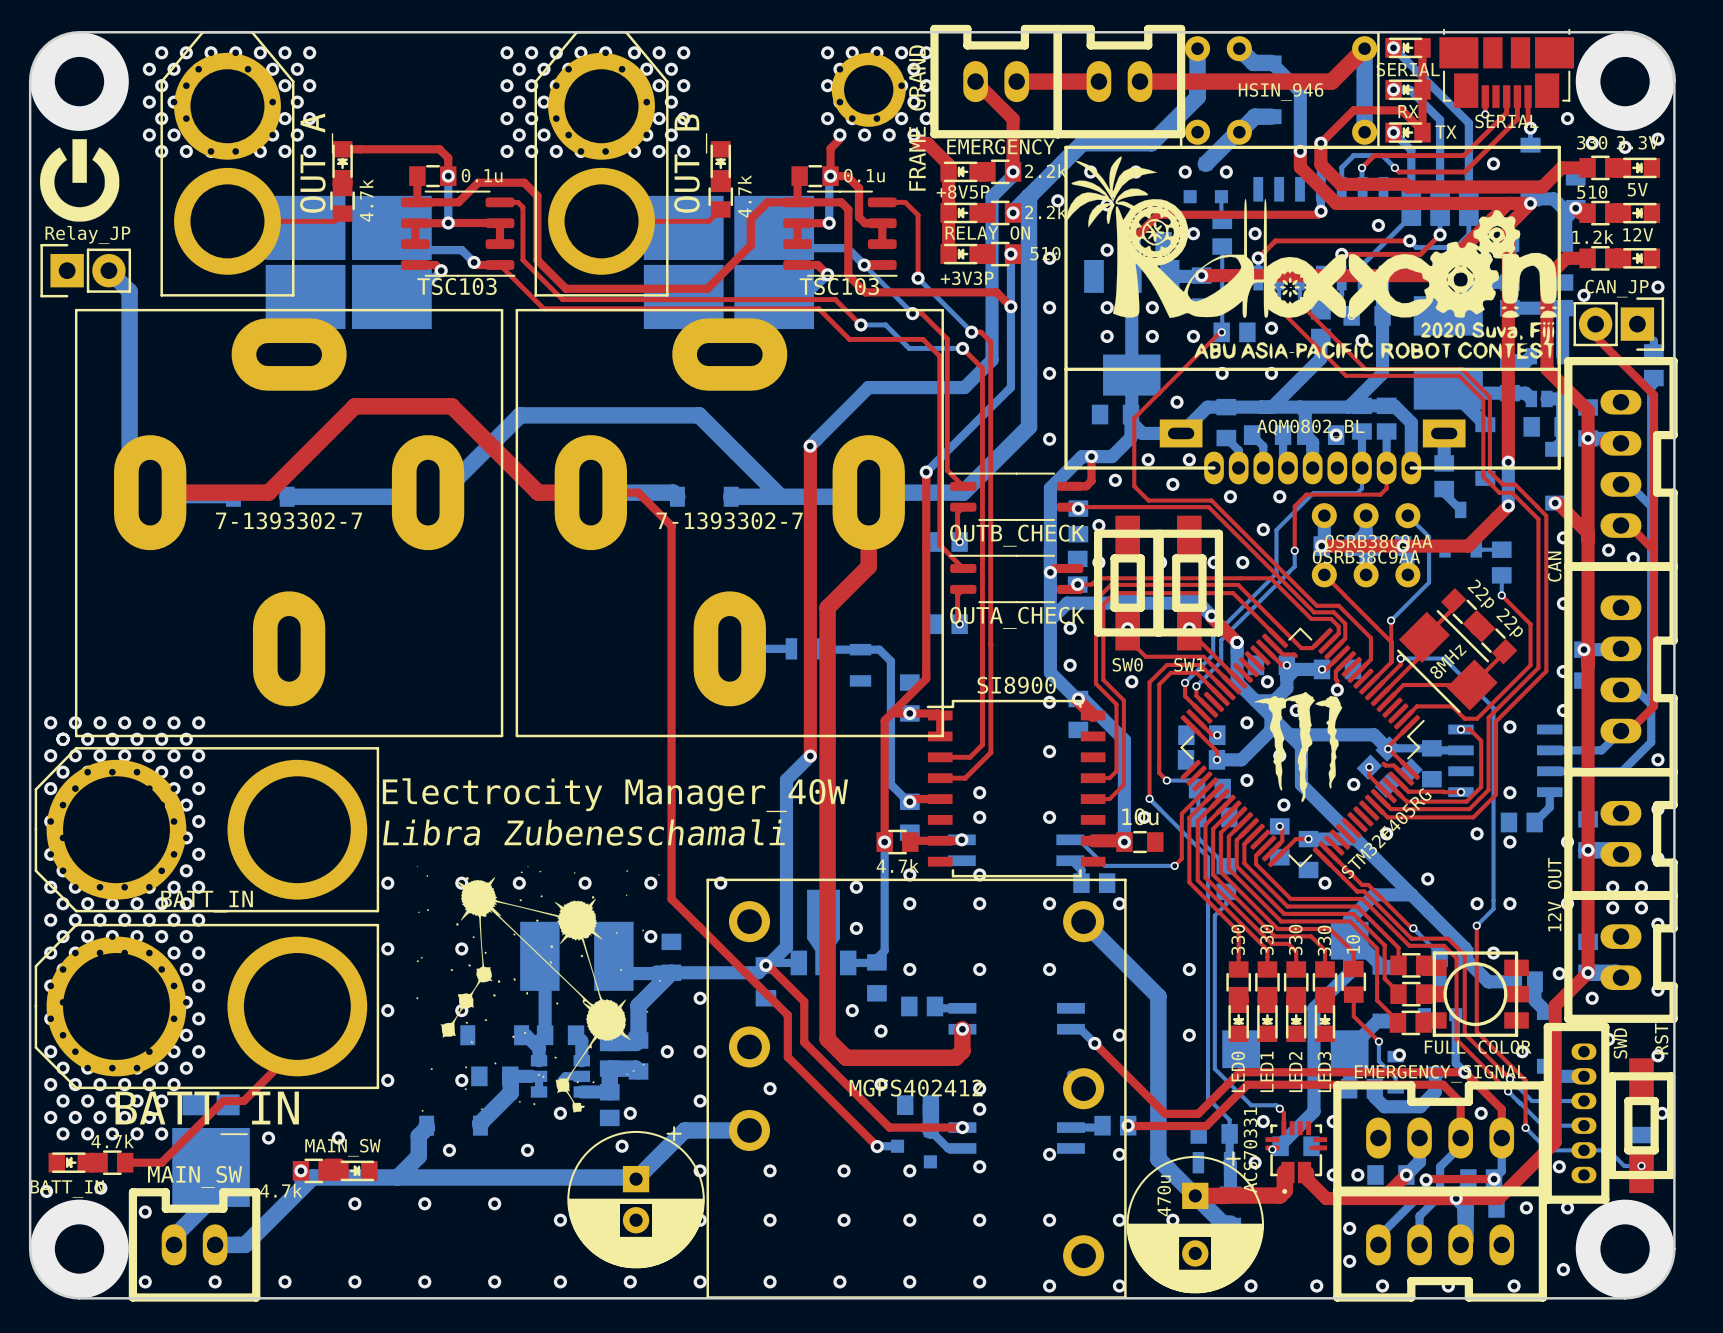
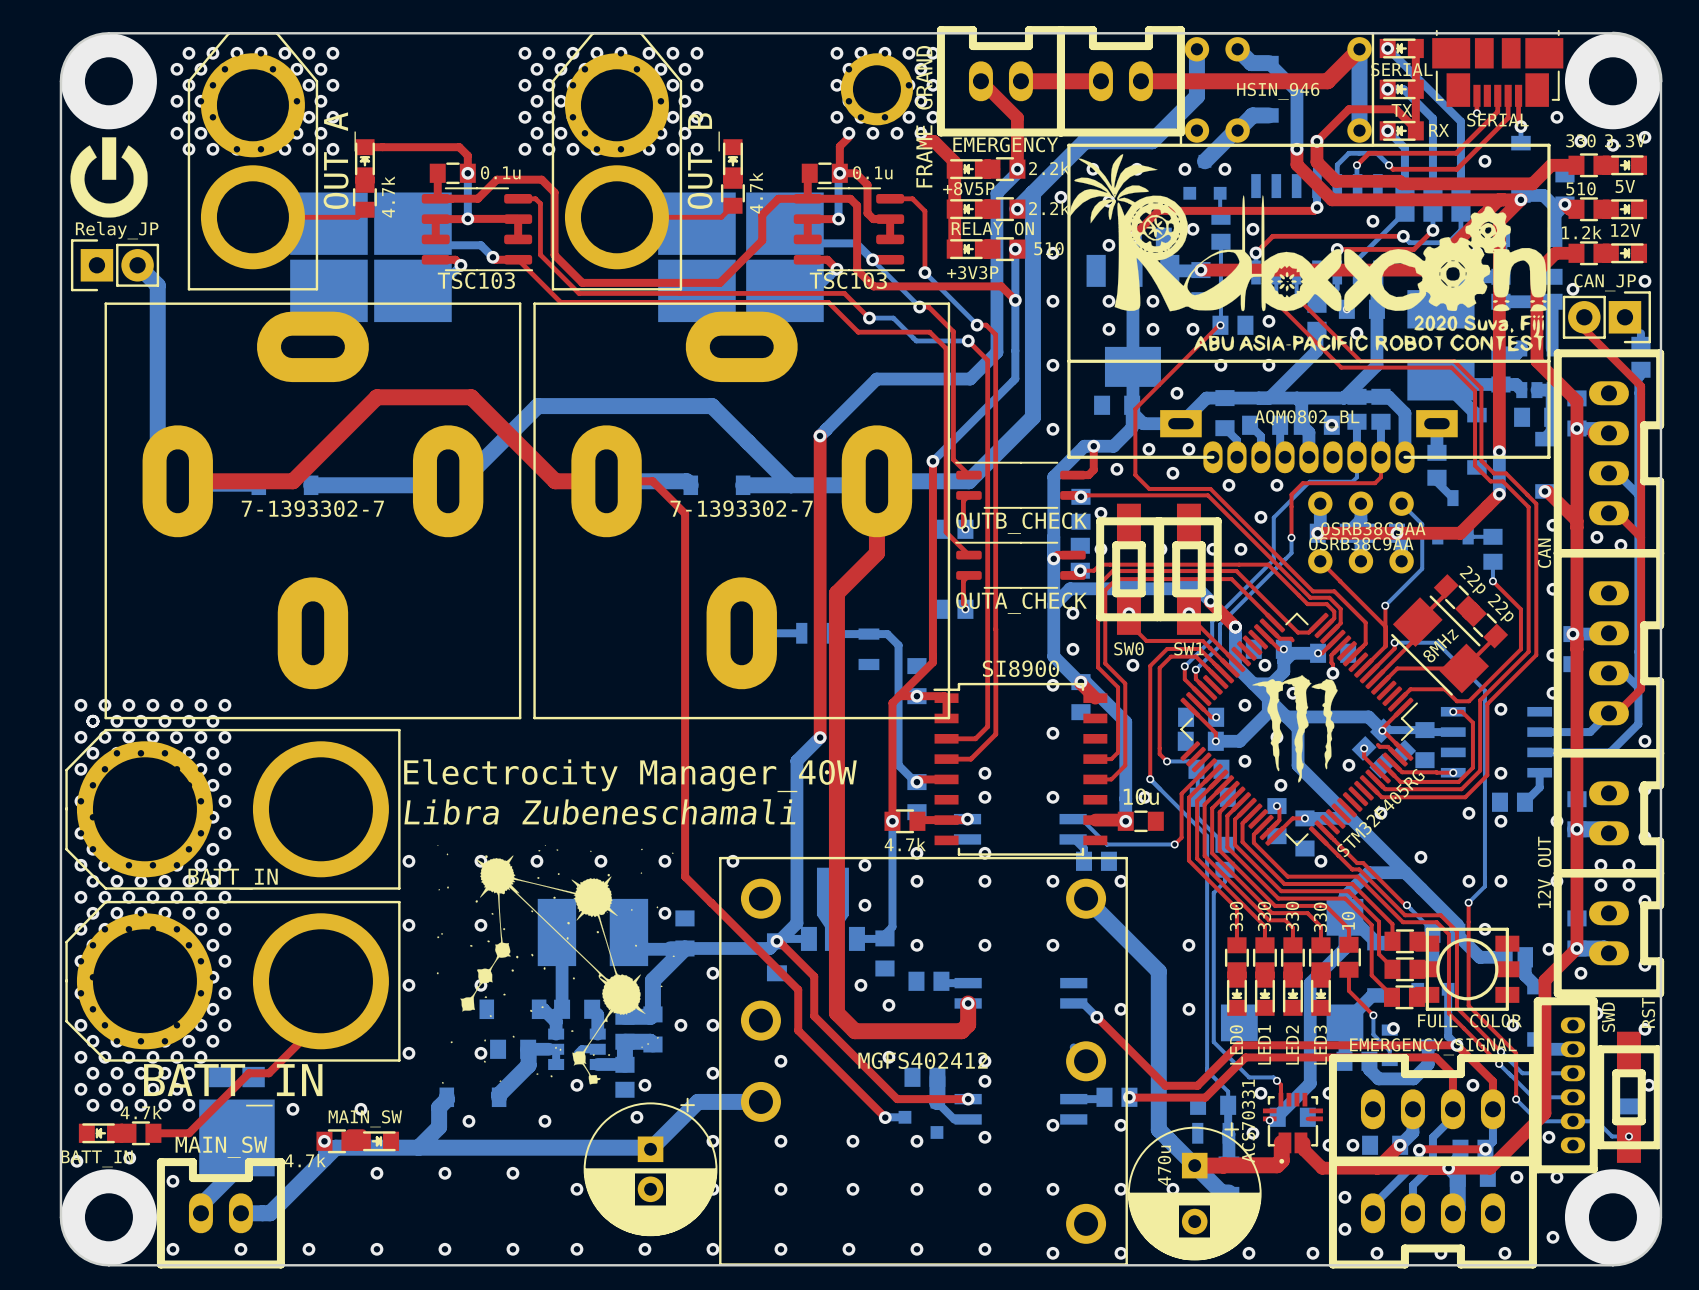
part value: RX (1408, 111) -> TX (1401, 110)
part value: TX (1445, 132) -> RX (1439, 130)

